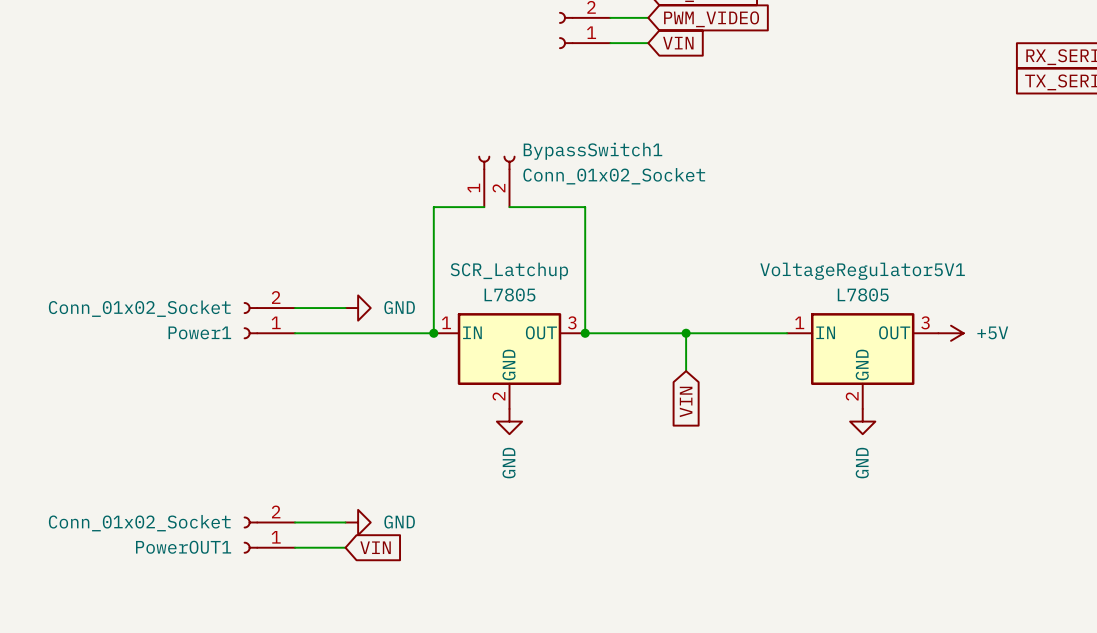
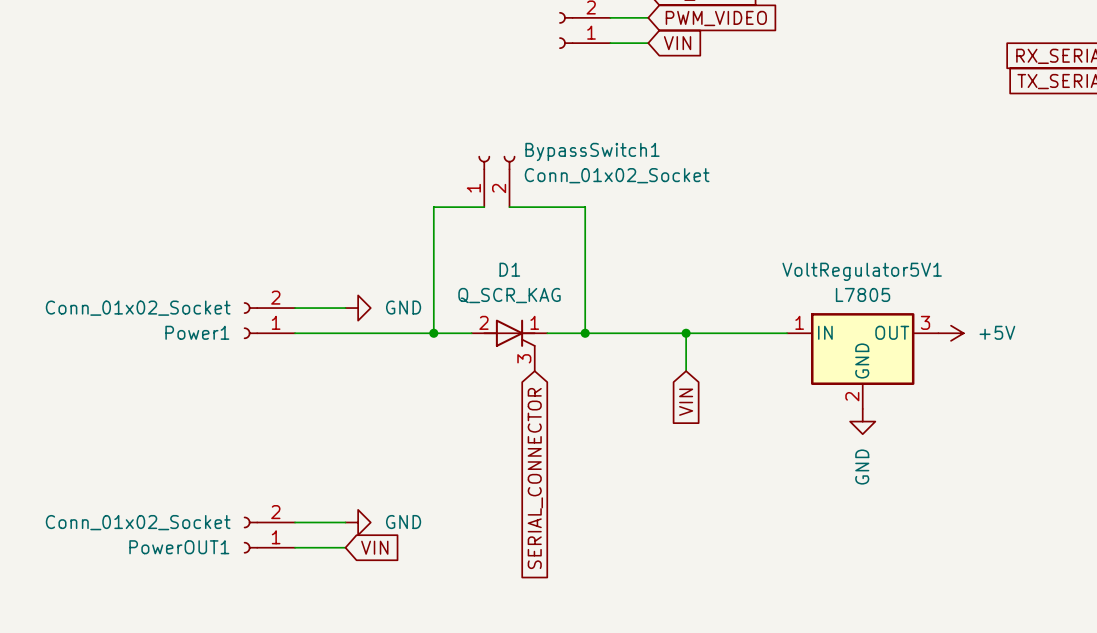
VoltageRegulator5V1 name: VoltageRegulator5V1 (862, 271) -> VoltRegulator5V1 (862, 271)
D1: none -> Q_SCR_KAG (509, 345)
SCR_Latchup: L7805 (509, 361) -> none
power symbol: GND (509, 421) -> none
global label: none -> SERIAL_CONNECTOR (535, 478)

